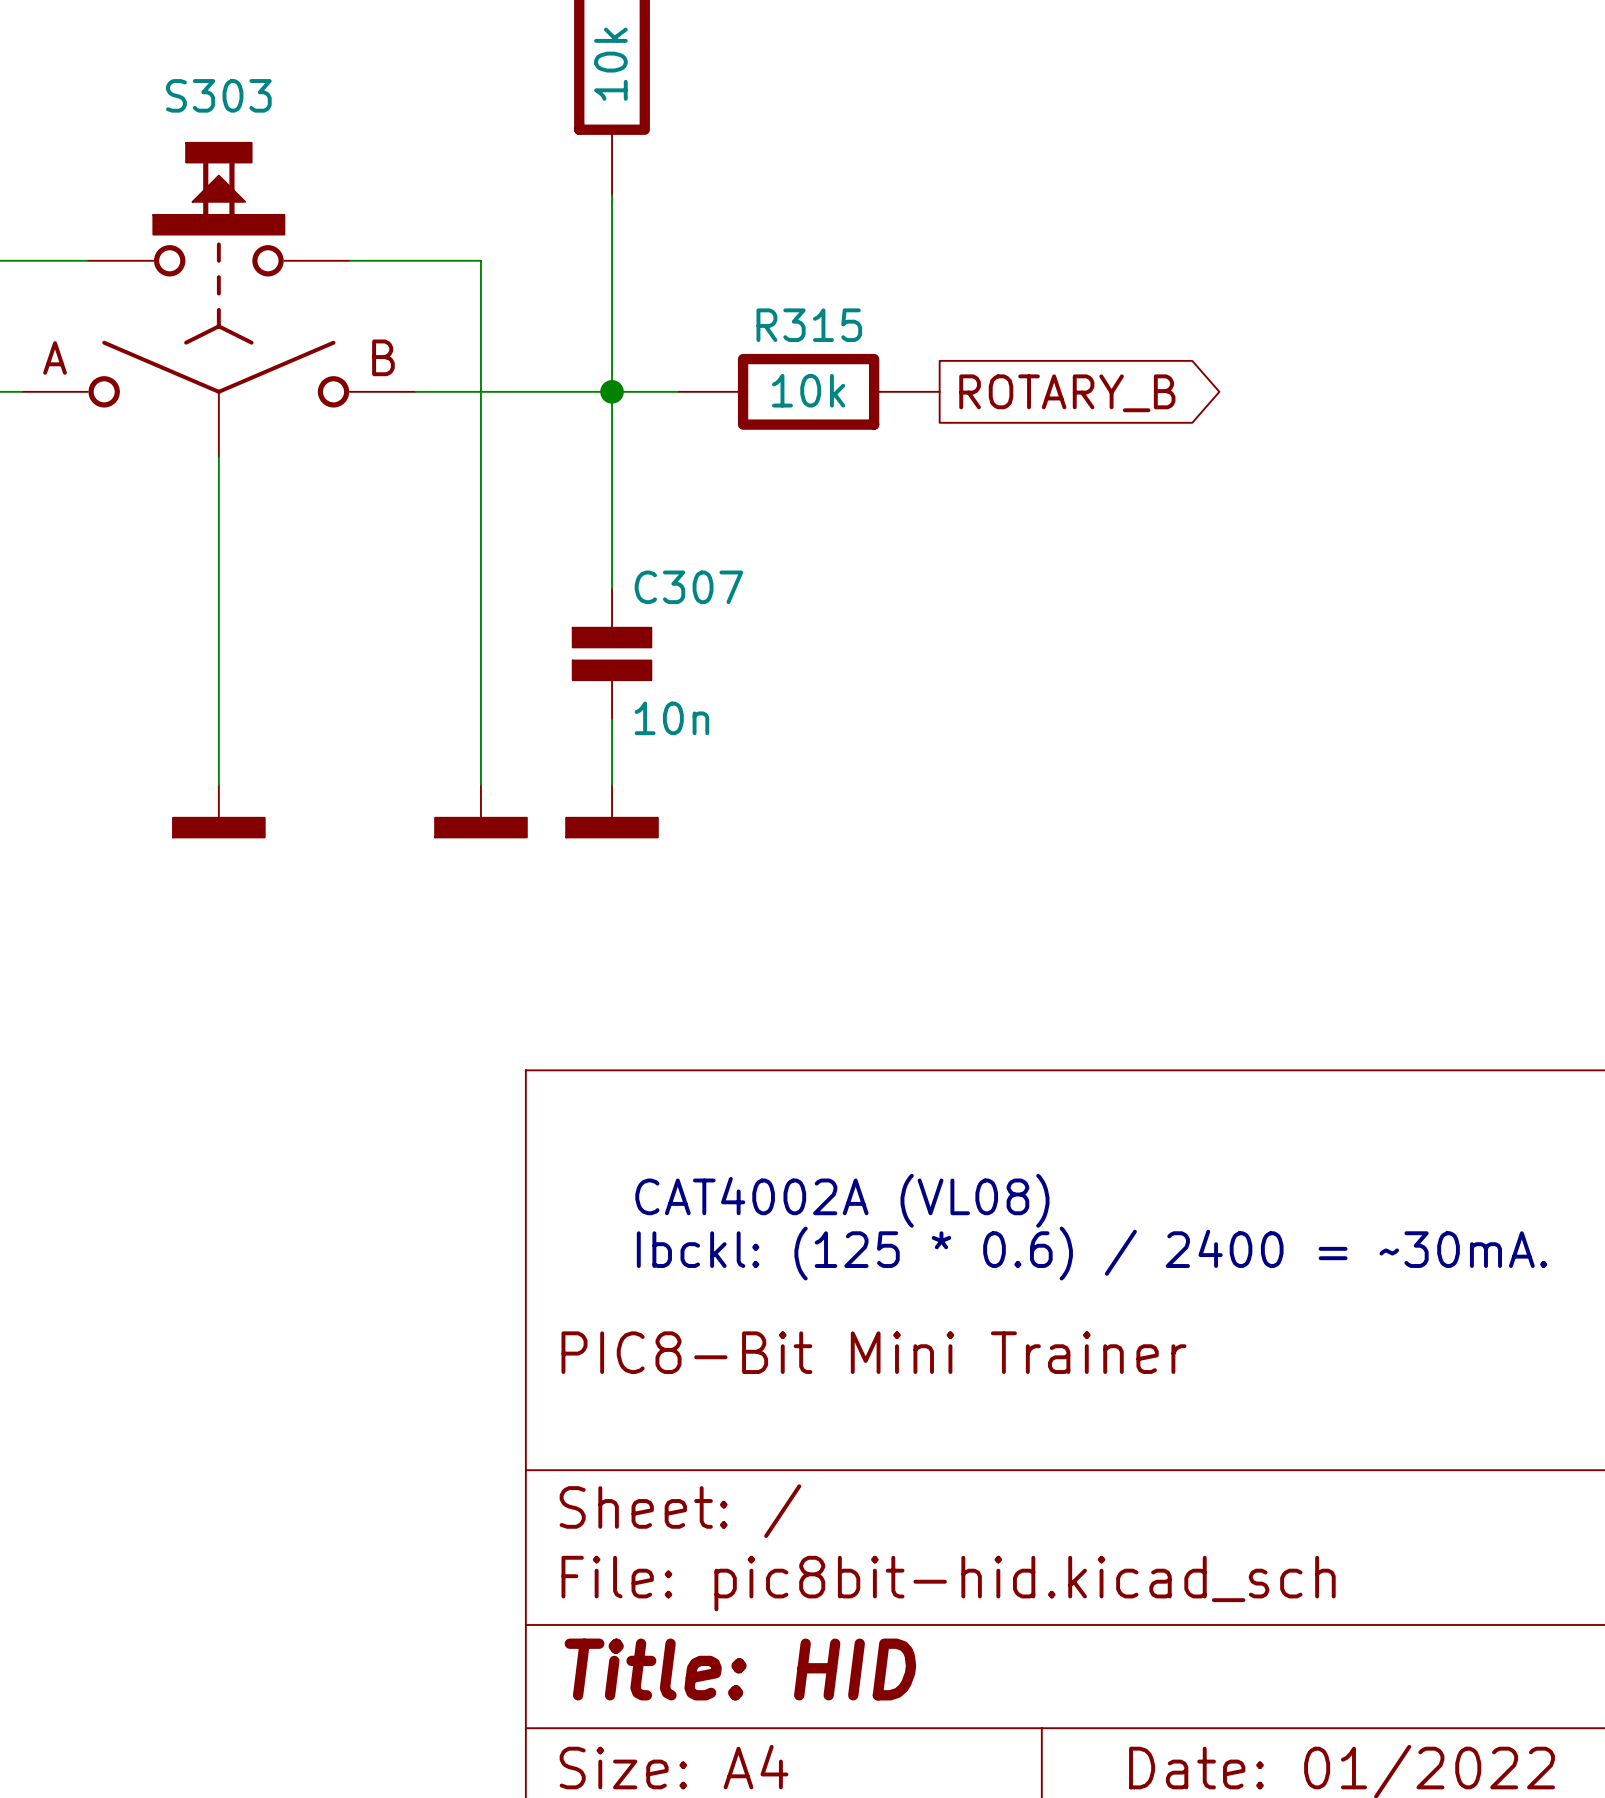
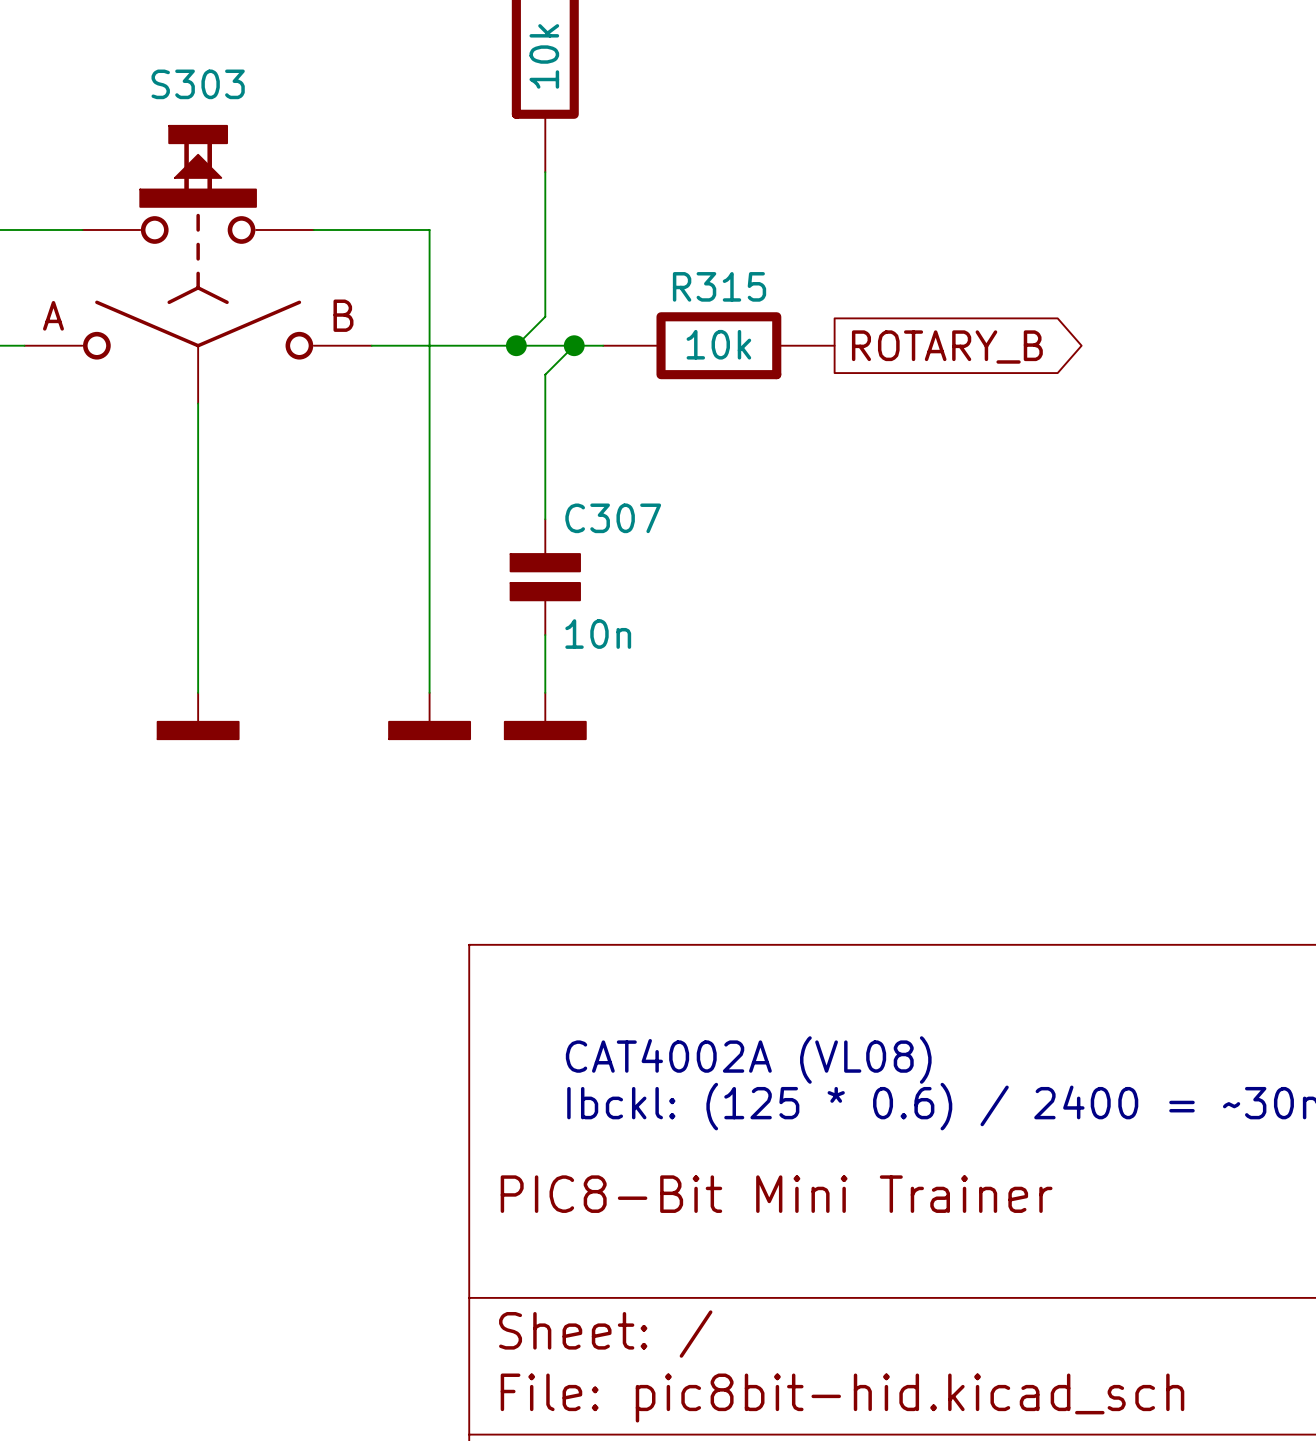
wire: (612, 359) (612, 424) -> (574, 345) (545, 374)
wire: none -> (545, 316) (516, 345)
junction: none -> (516, 345)
junction: (612, 391) -> none
junction: none -> (574, 345)

